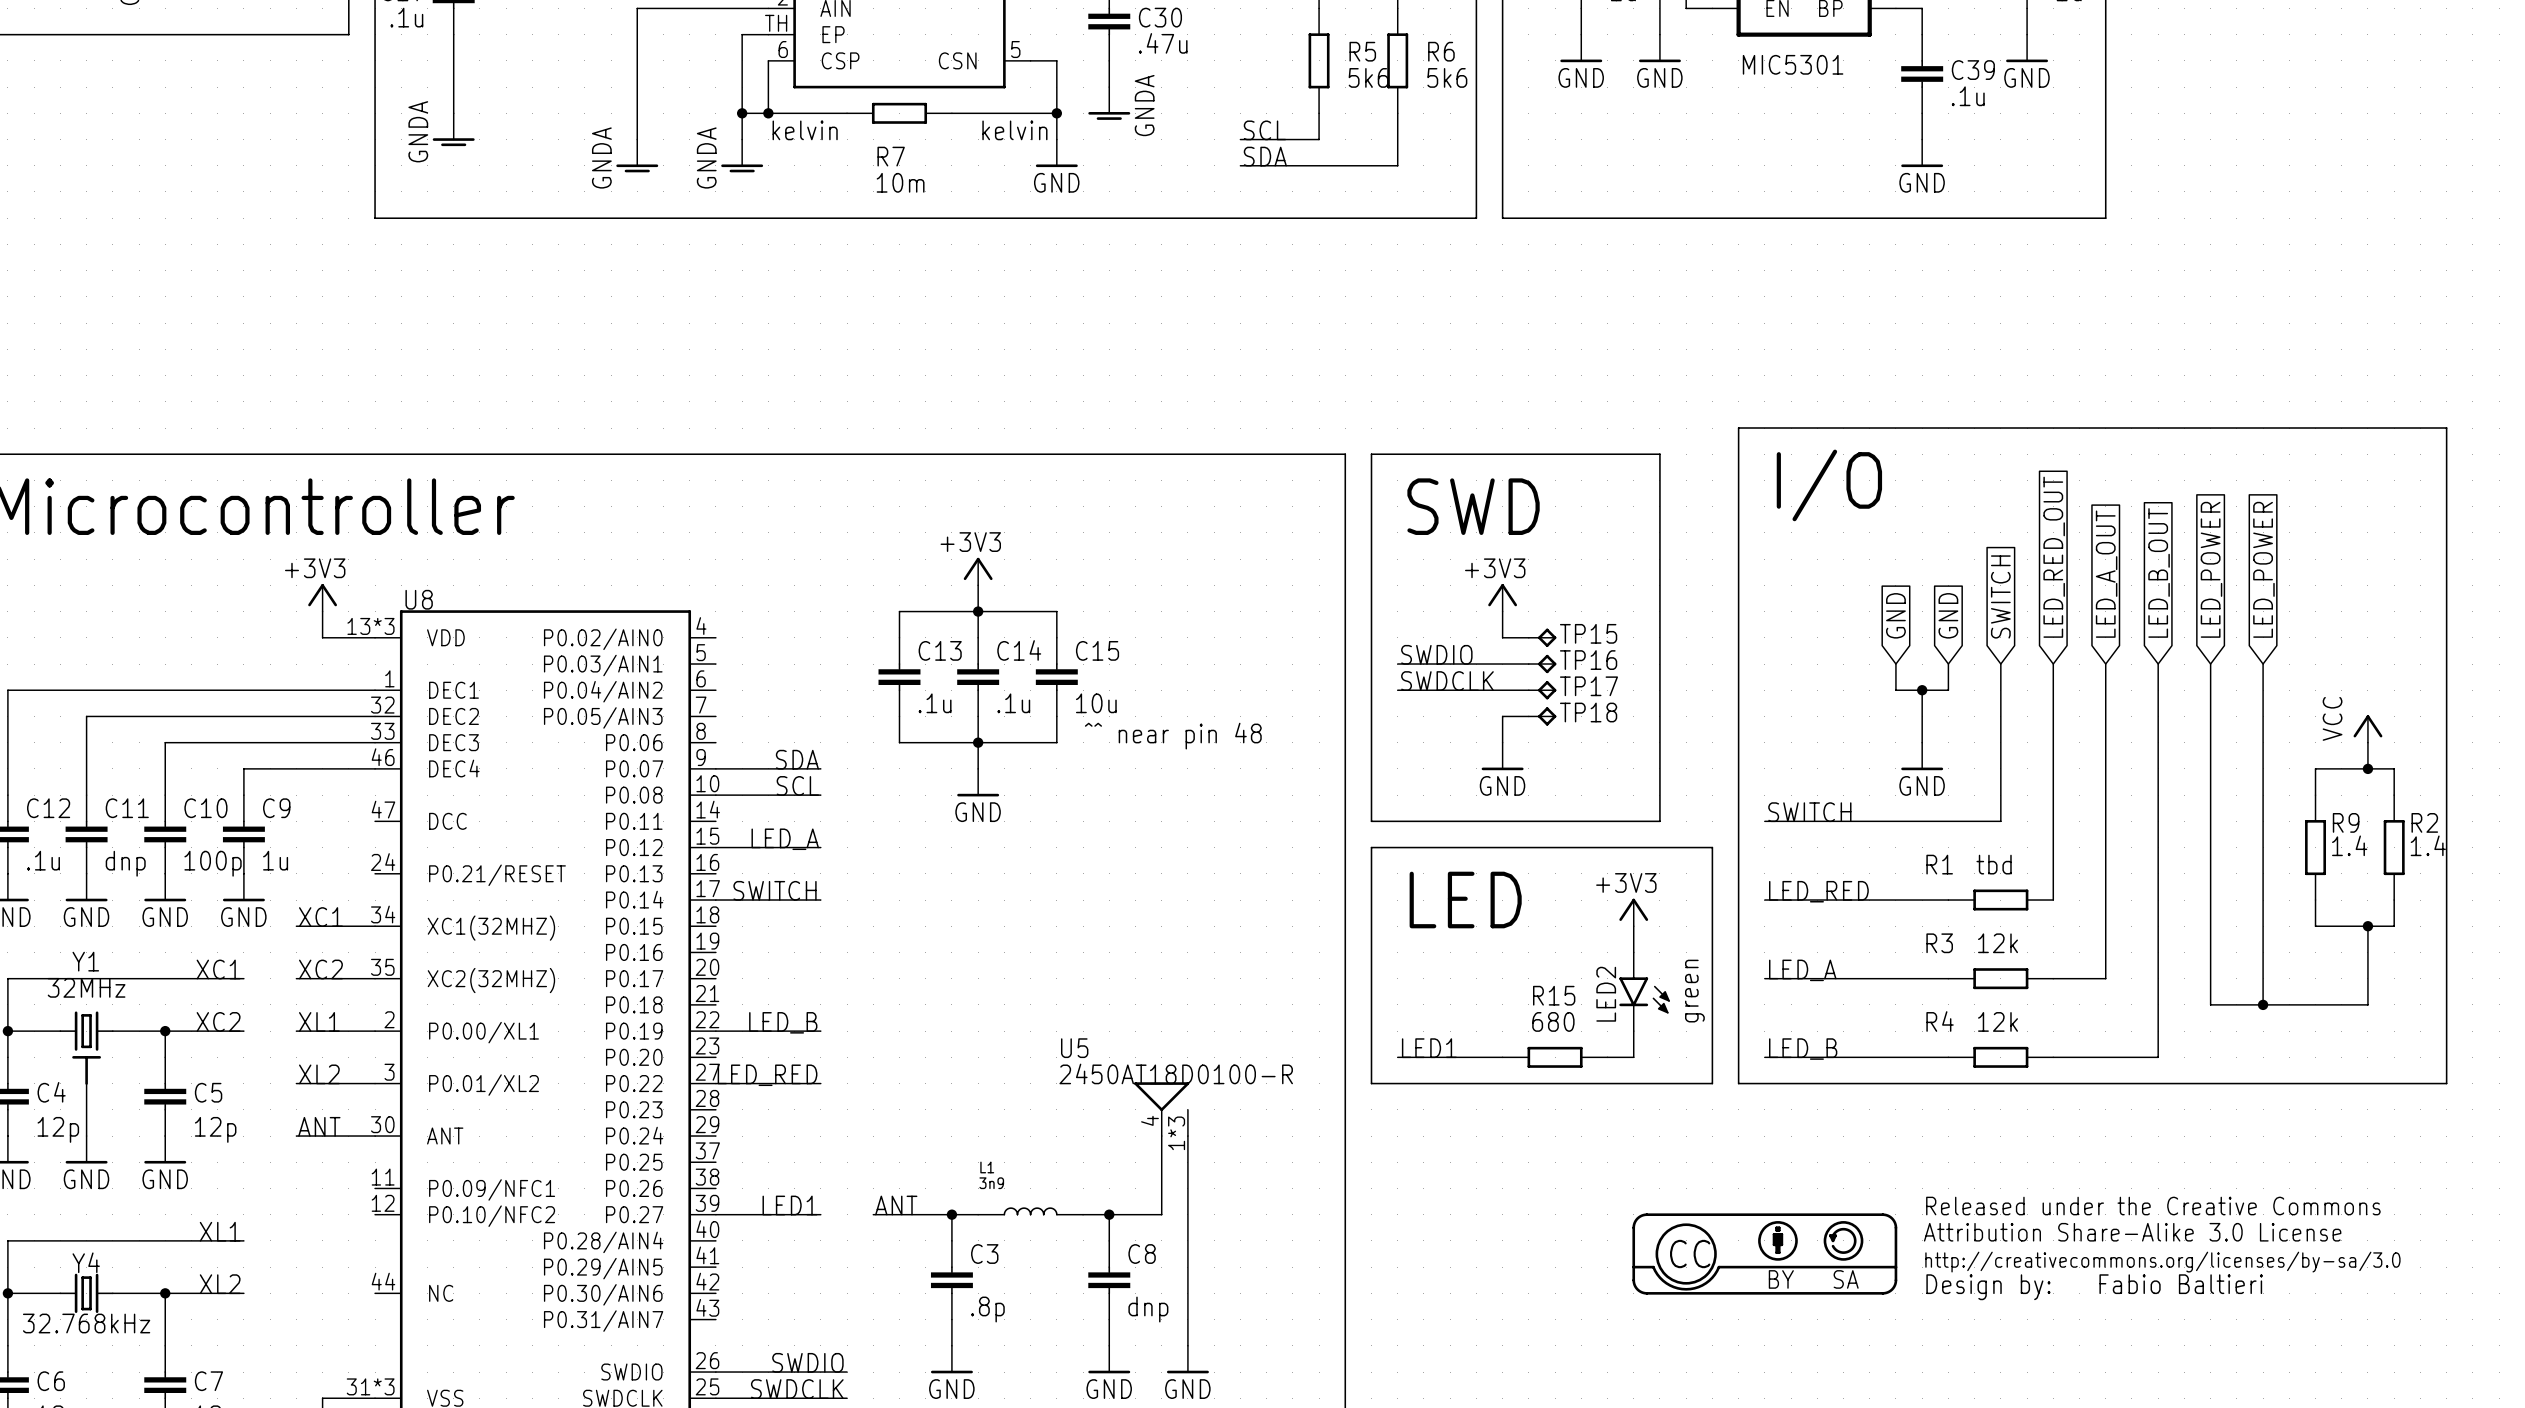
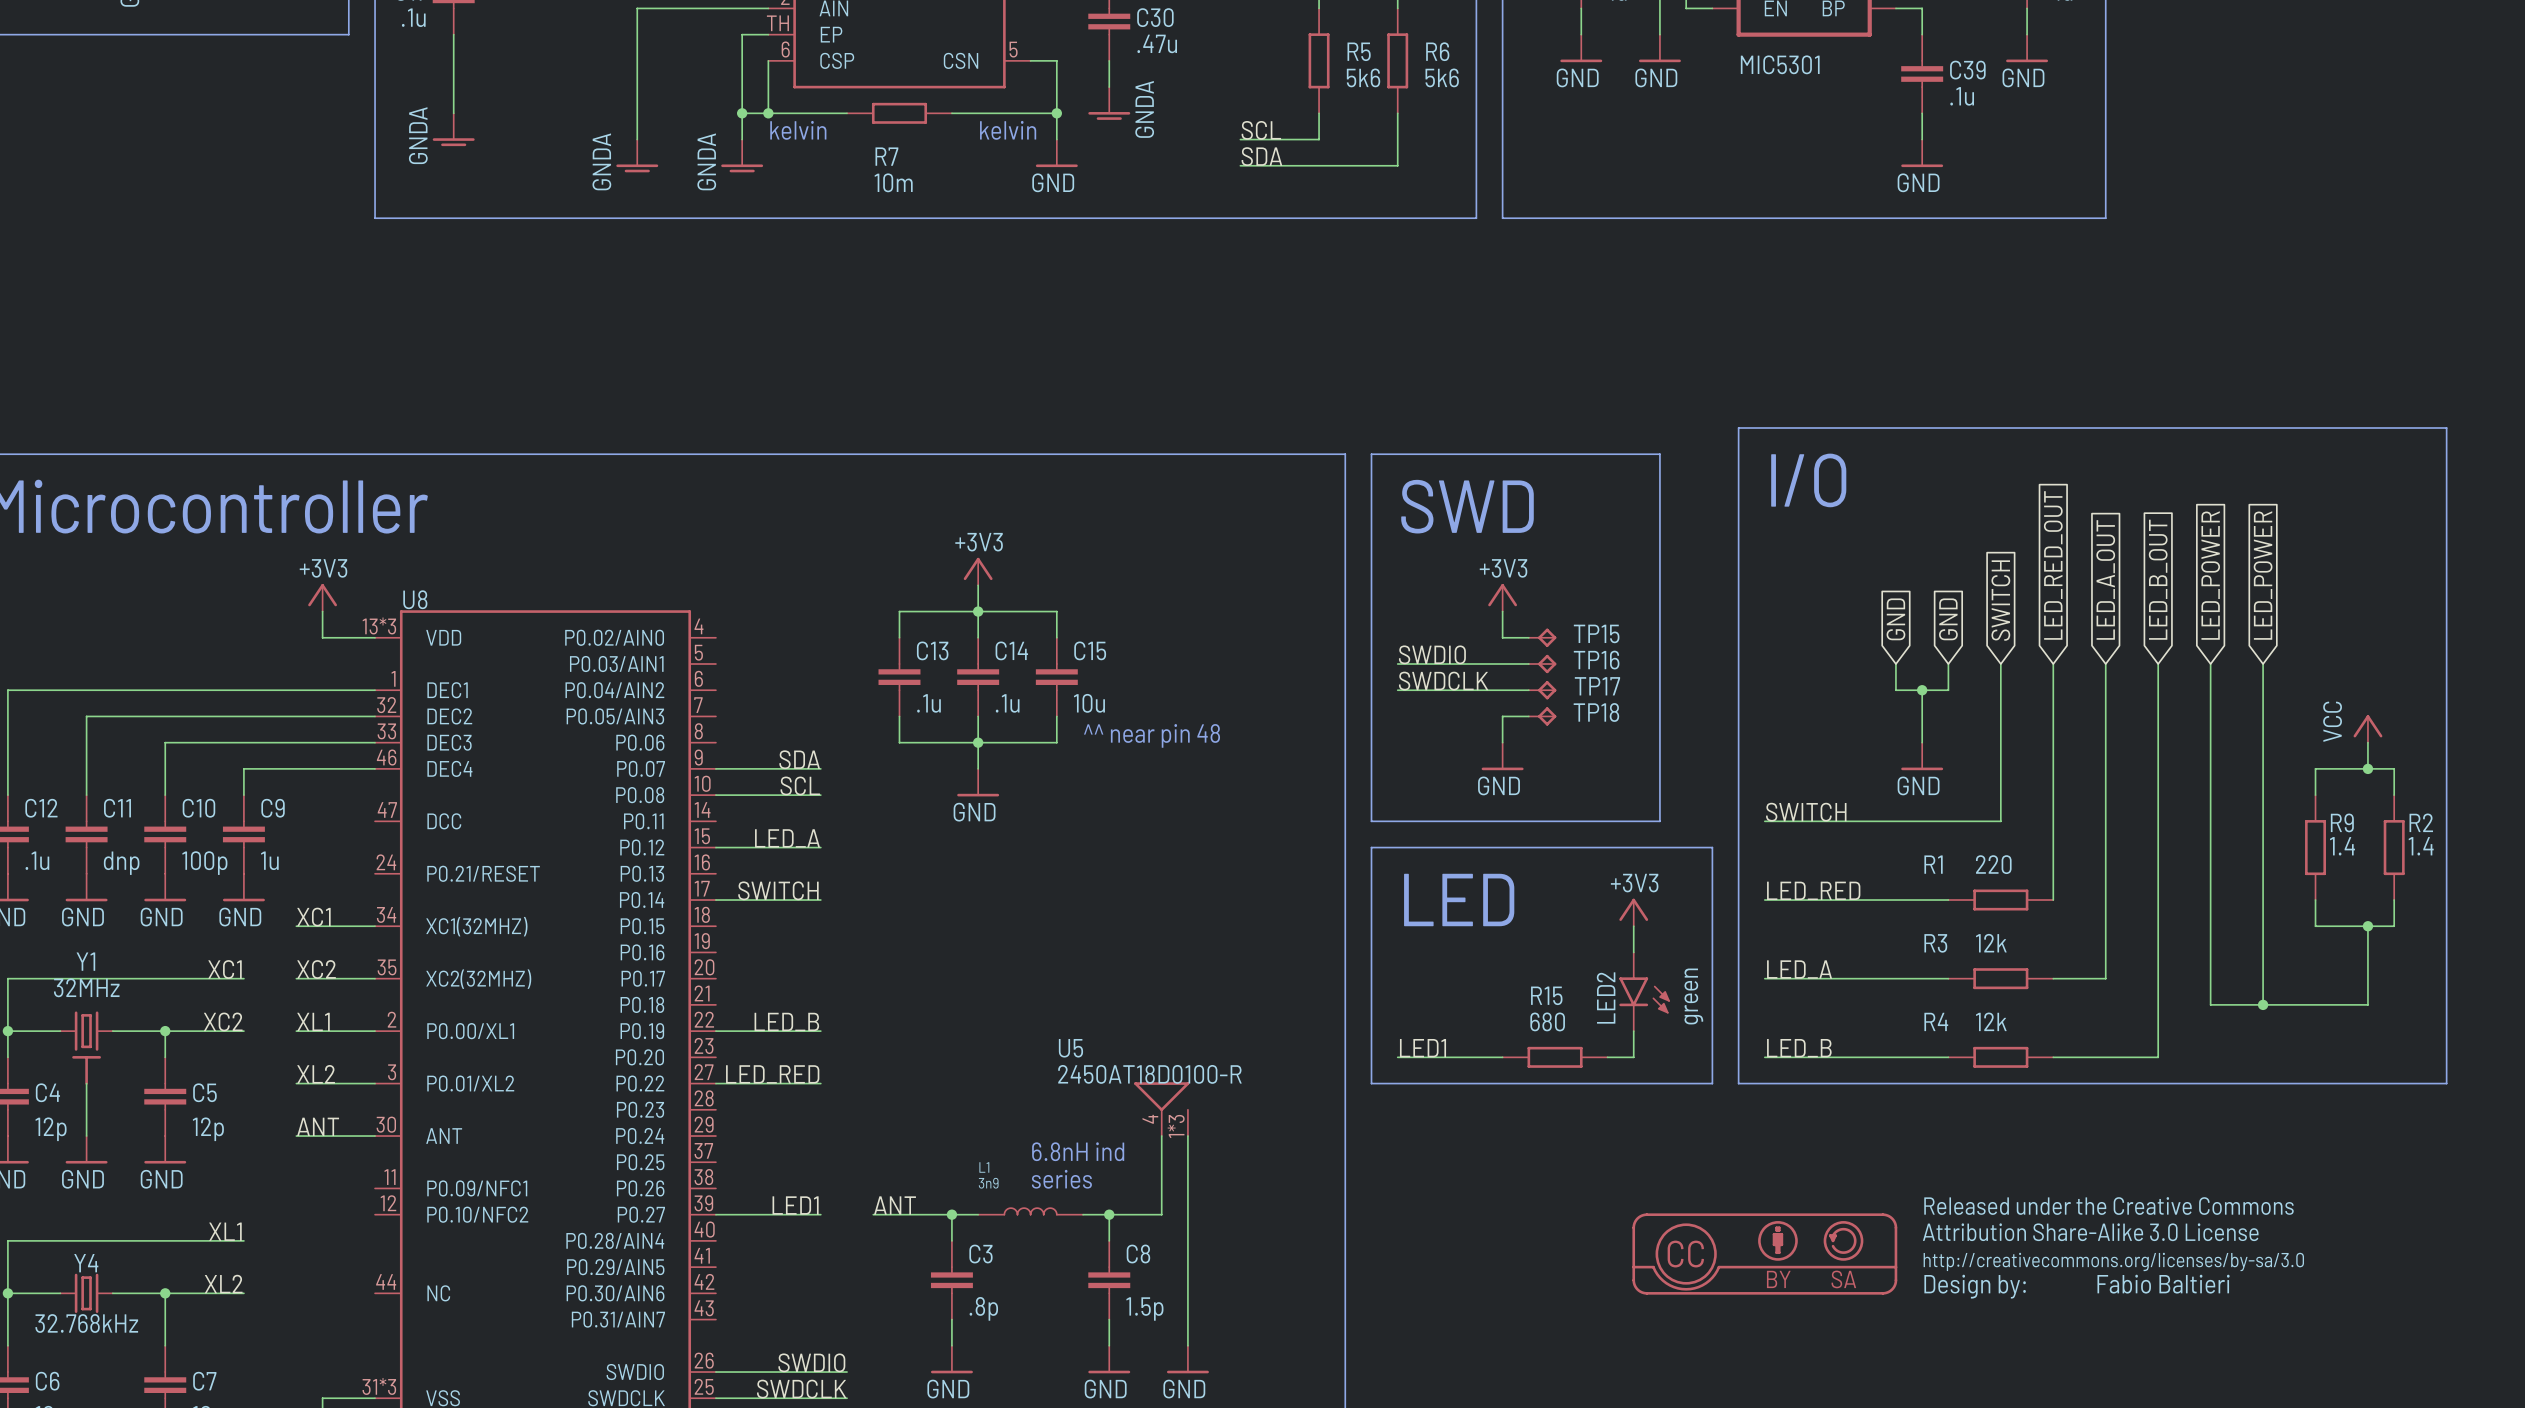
R1 value: tbd (1994, 864) -> 220 (1993, 864)
text: none -> 6.8nH ind (1078, 1151)
text: none -> series (1061, 1179)
C8 value: dnp (1148, 1309) -> 1.5p (1144, 1309)

